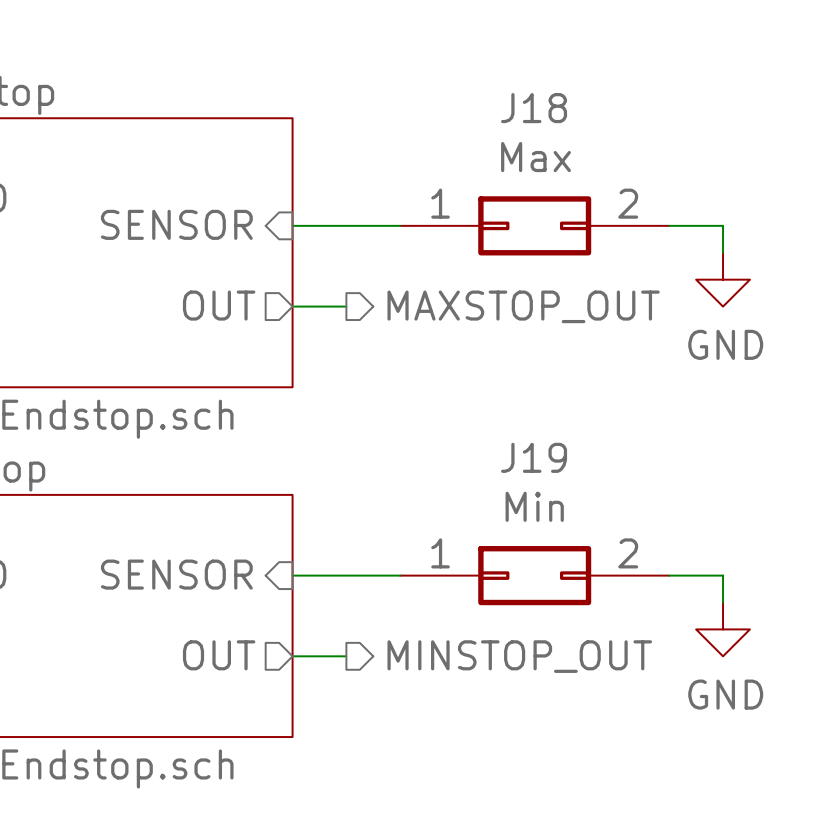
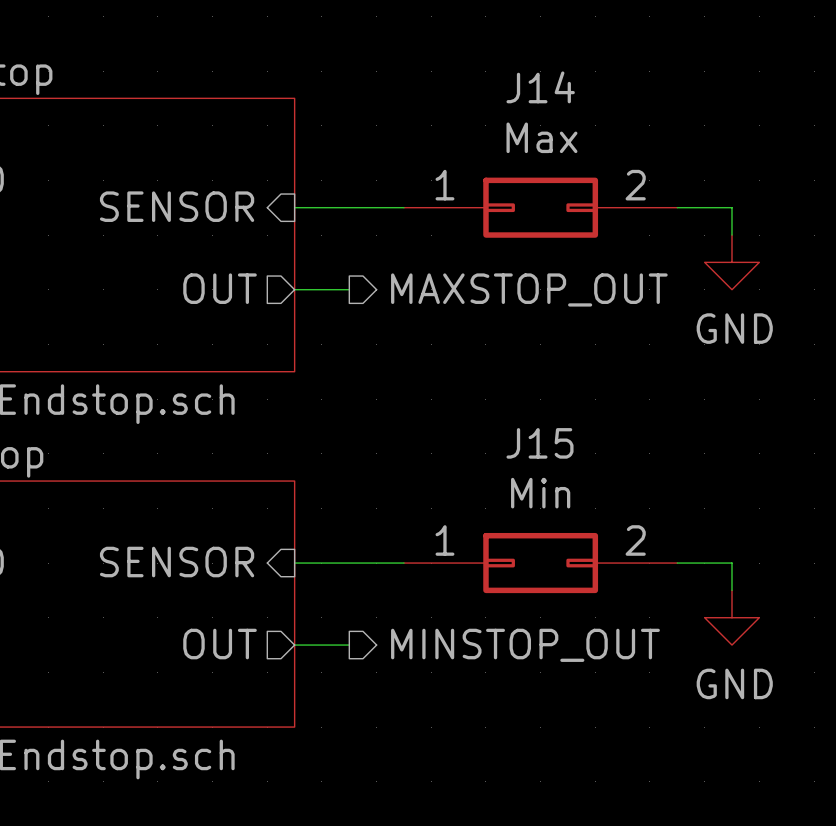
J18 name: J18 (534, 108) -> J14 (540, 87)
J19 name: J19 (534, 457) -> J15 (540, 443)

